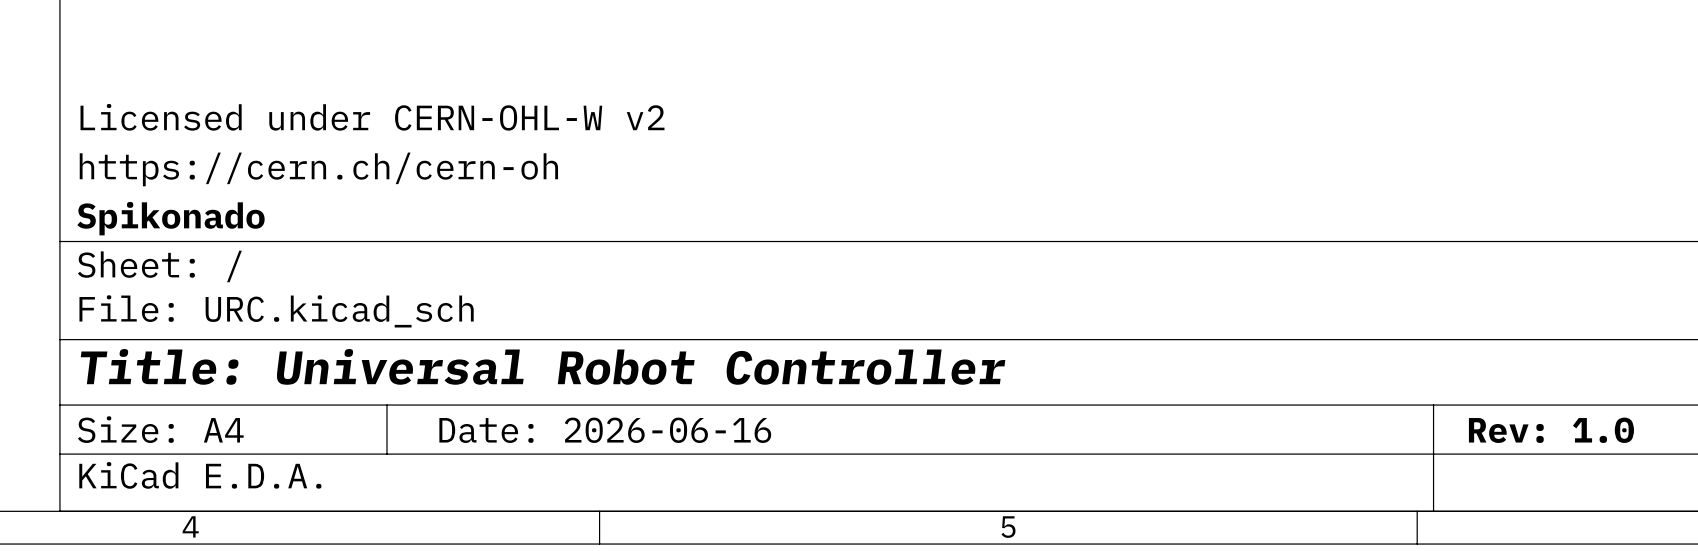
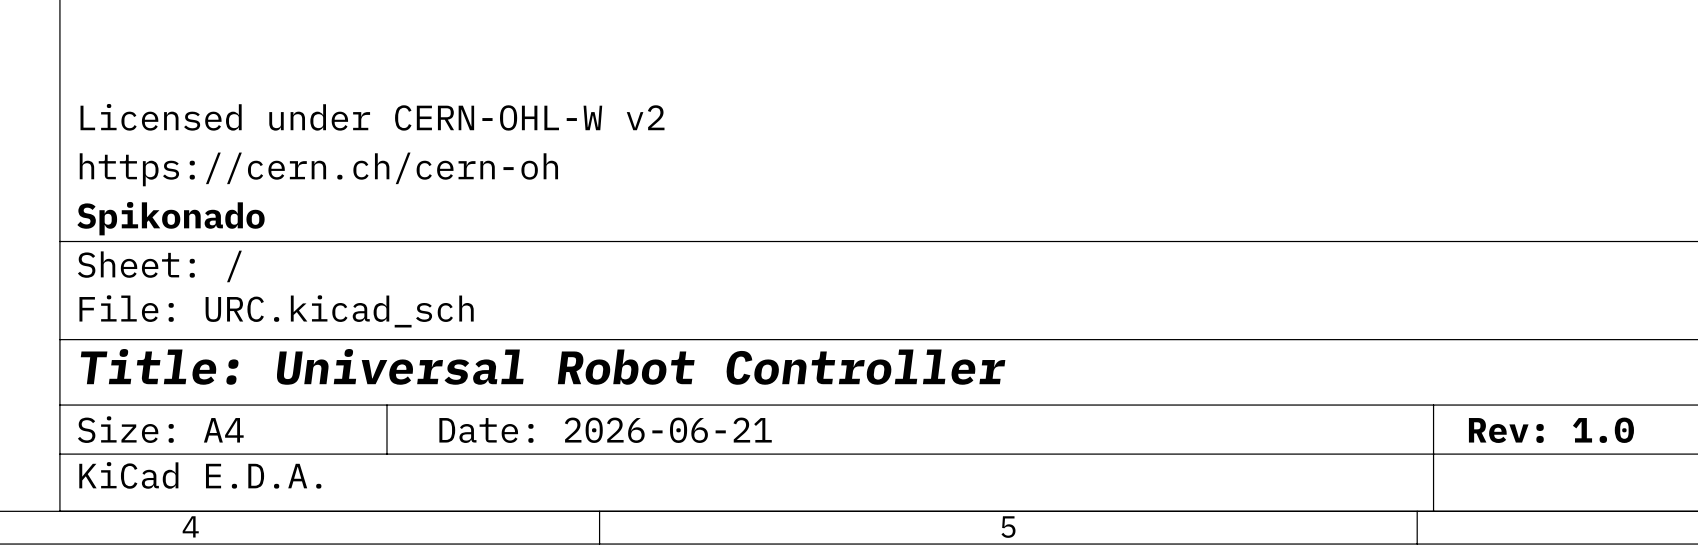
title block: Date: 2026-06-16 (605, 430) -> Date: 2026-06-21 (605, 430)

